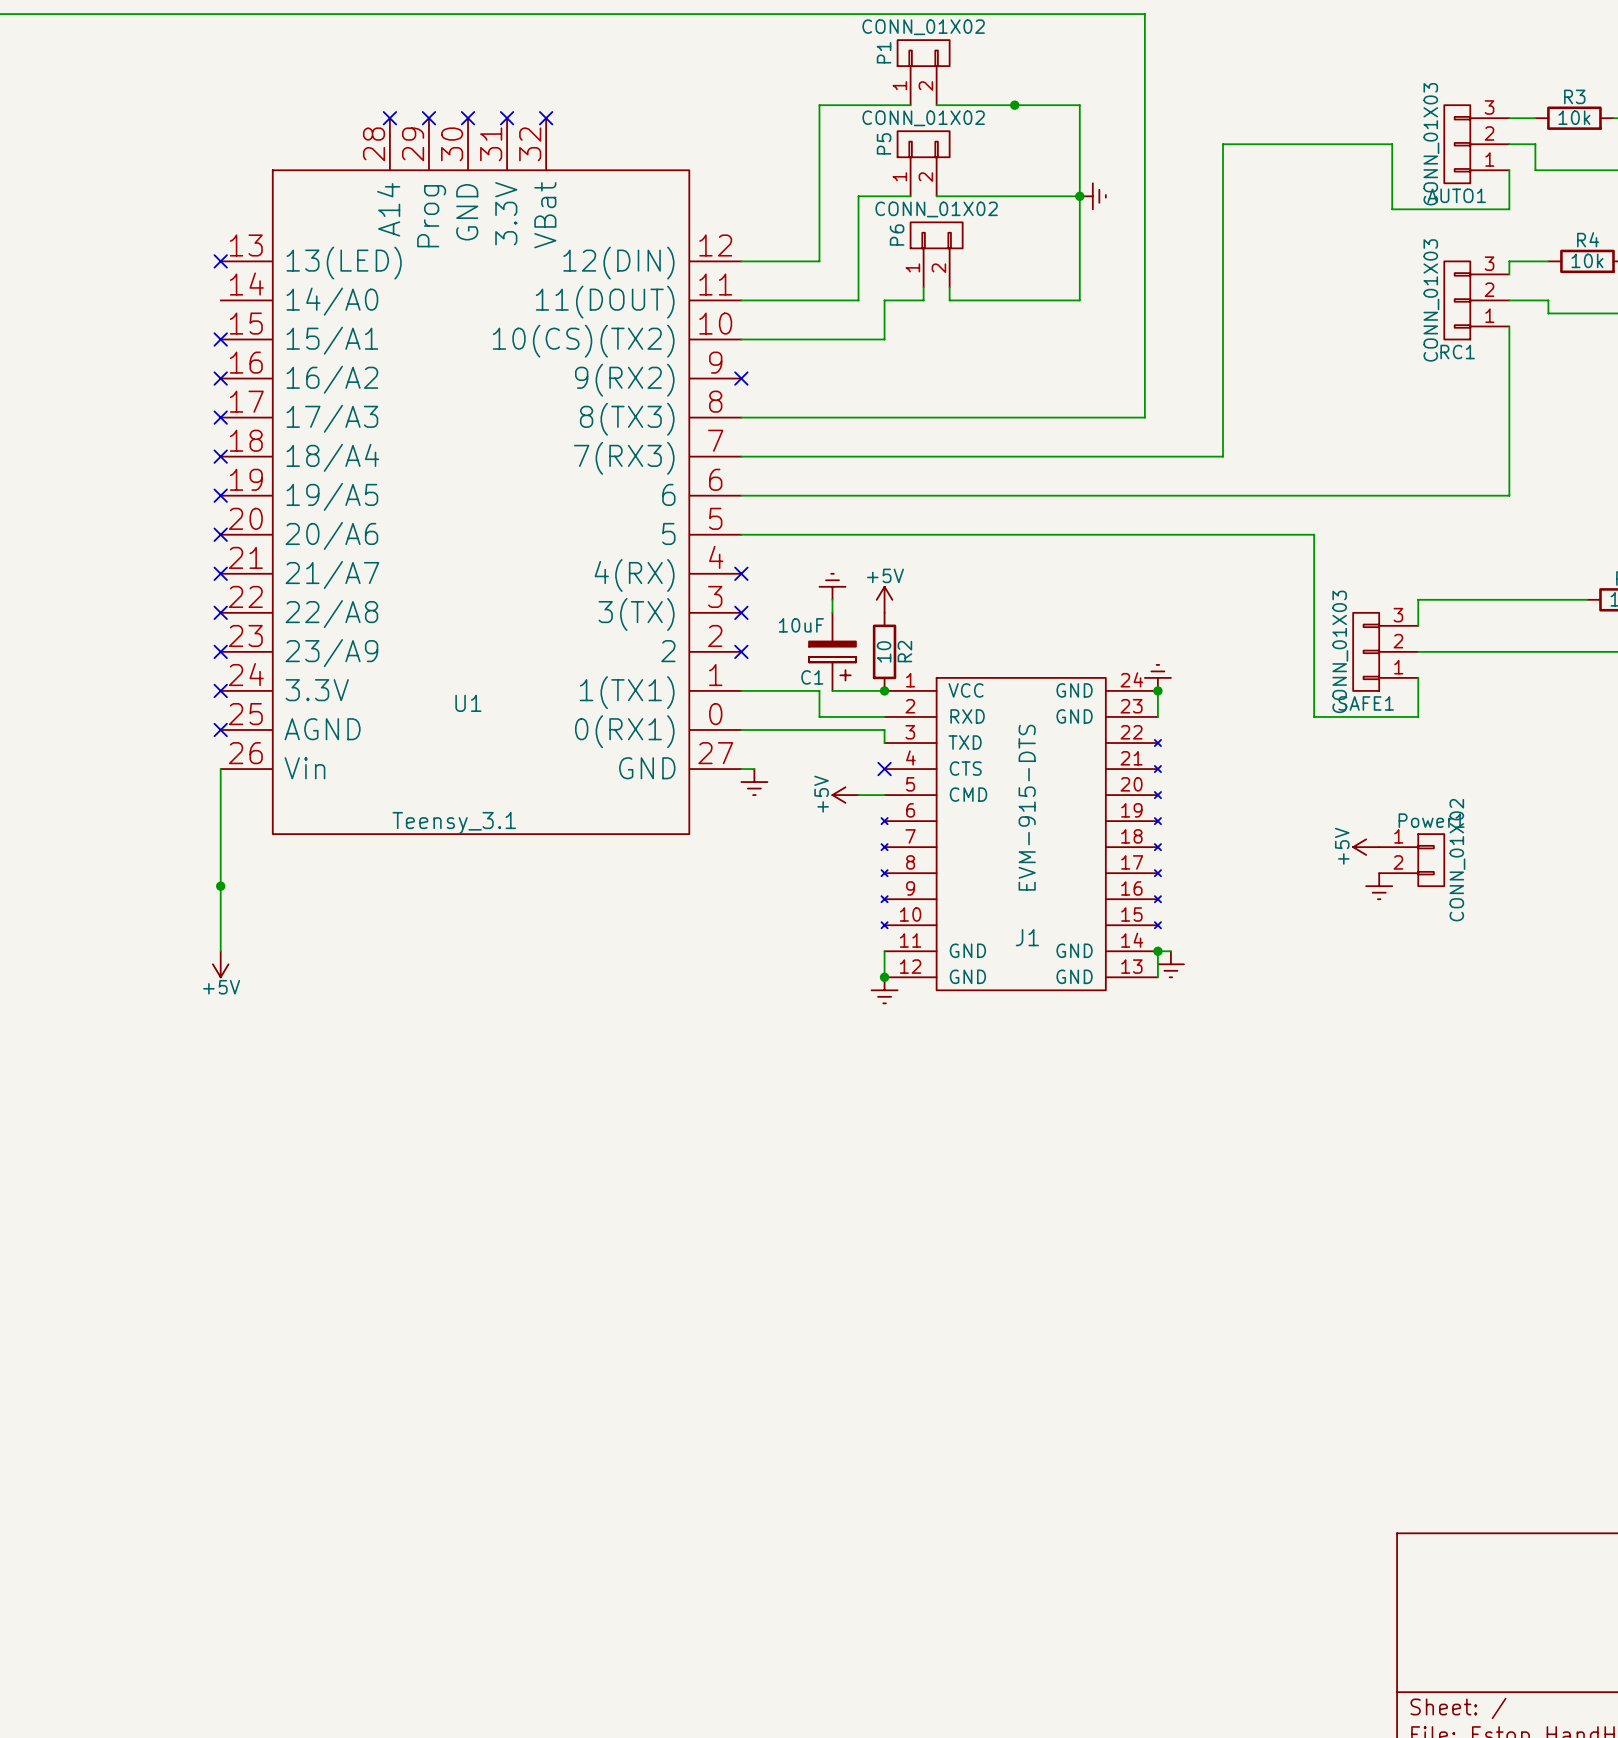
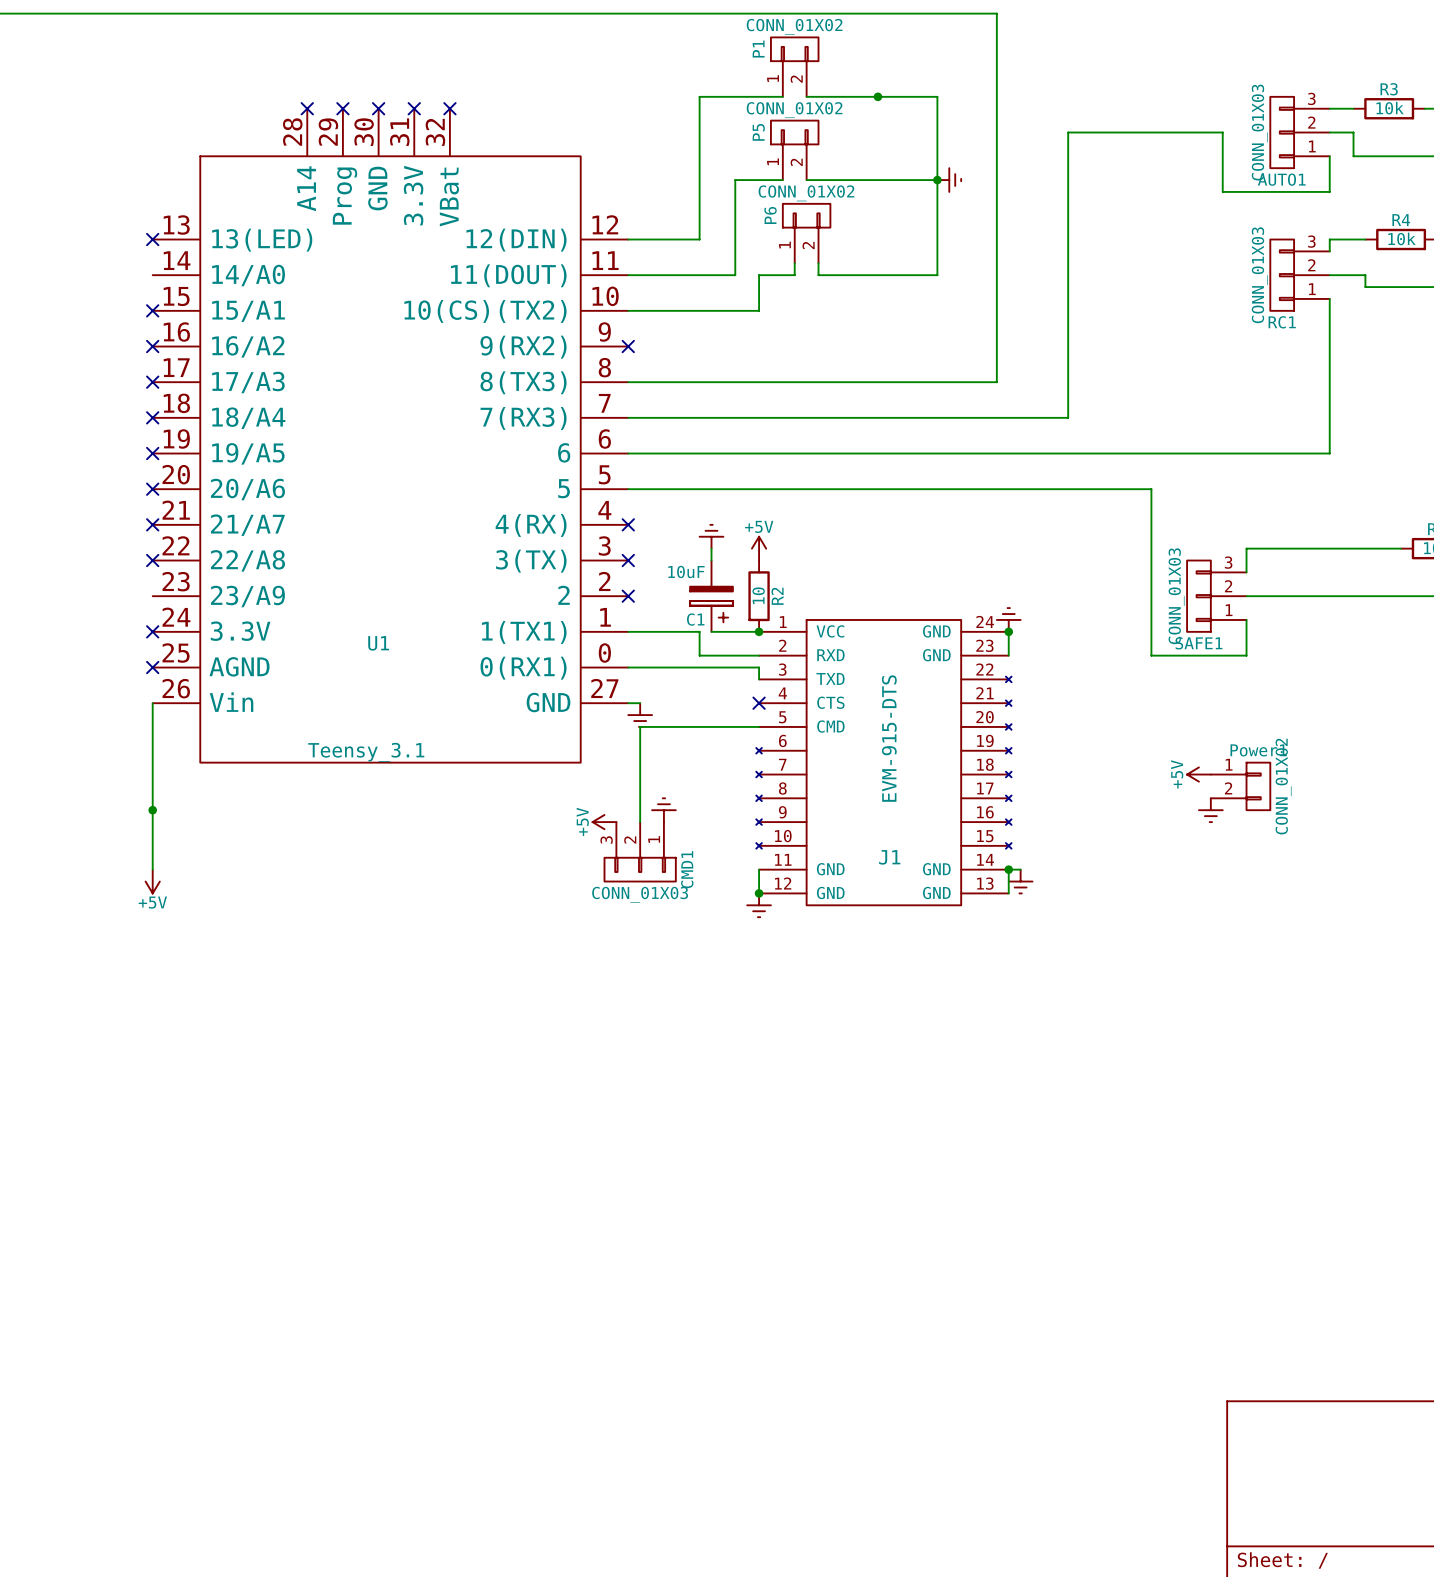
no-connect mark: (220, 651) -> none
power symbol position: +5V (845, 795) -> +5V (604, 822)
wire: none -> (735, 726) (640, 726) (640, 822)
power symbol: none -> (663, 810)
CMD1: none -> CONN_01X03 (640, 851)

